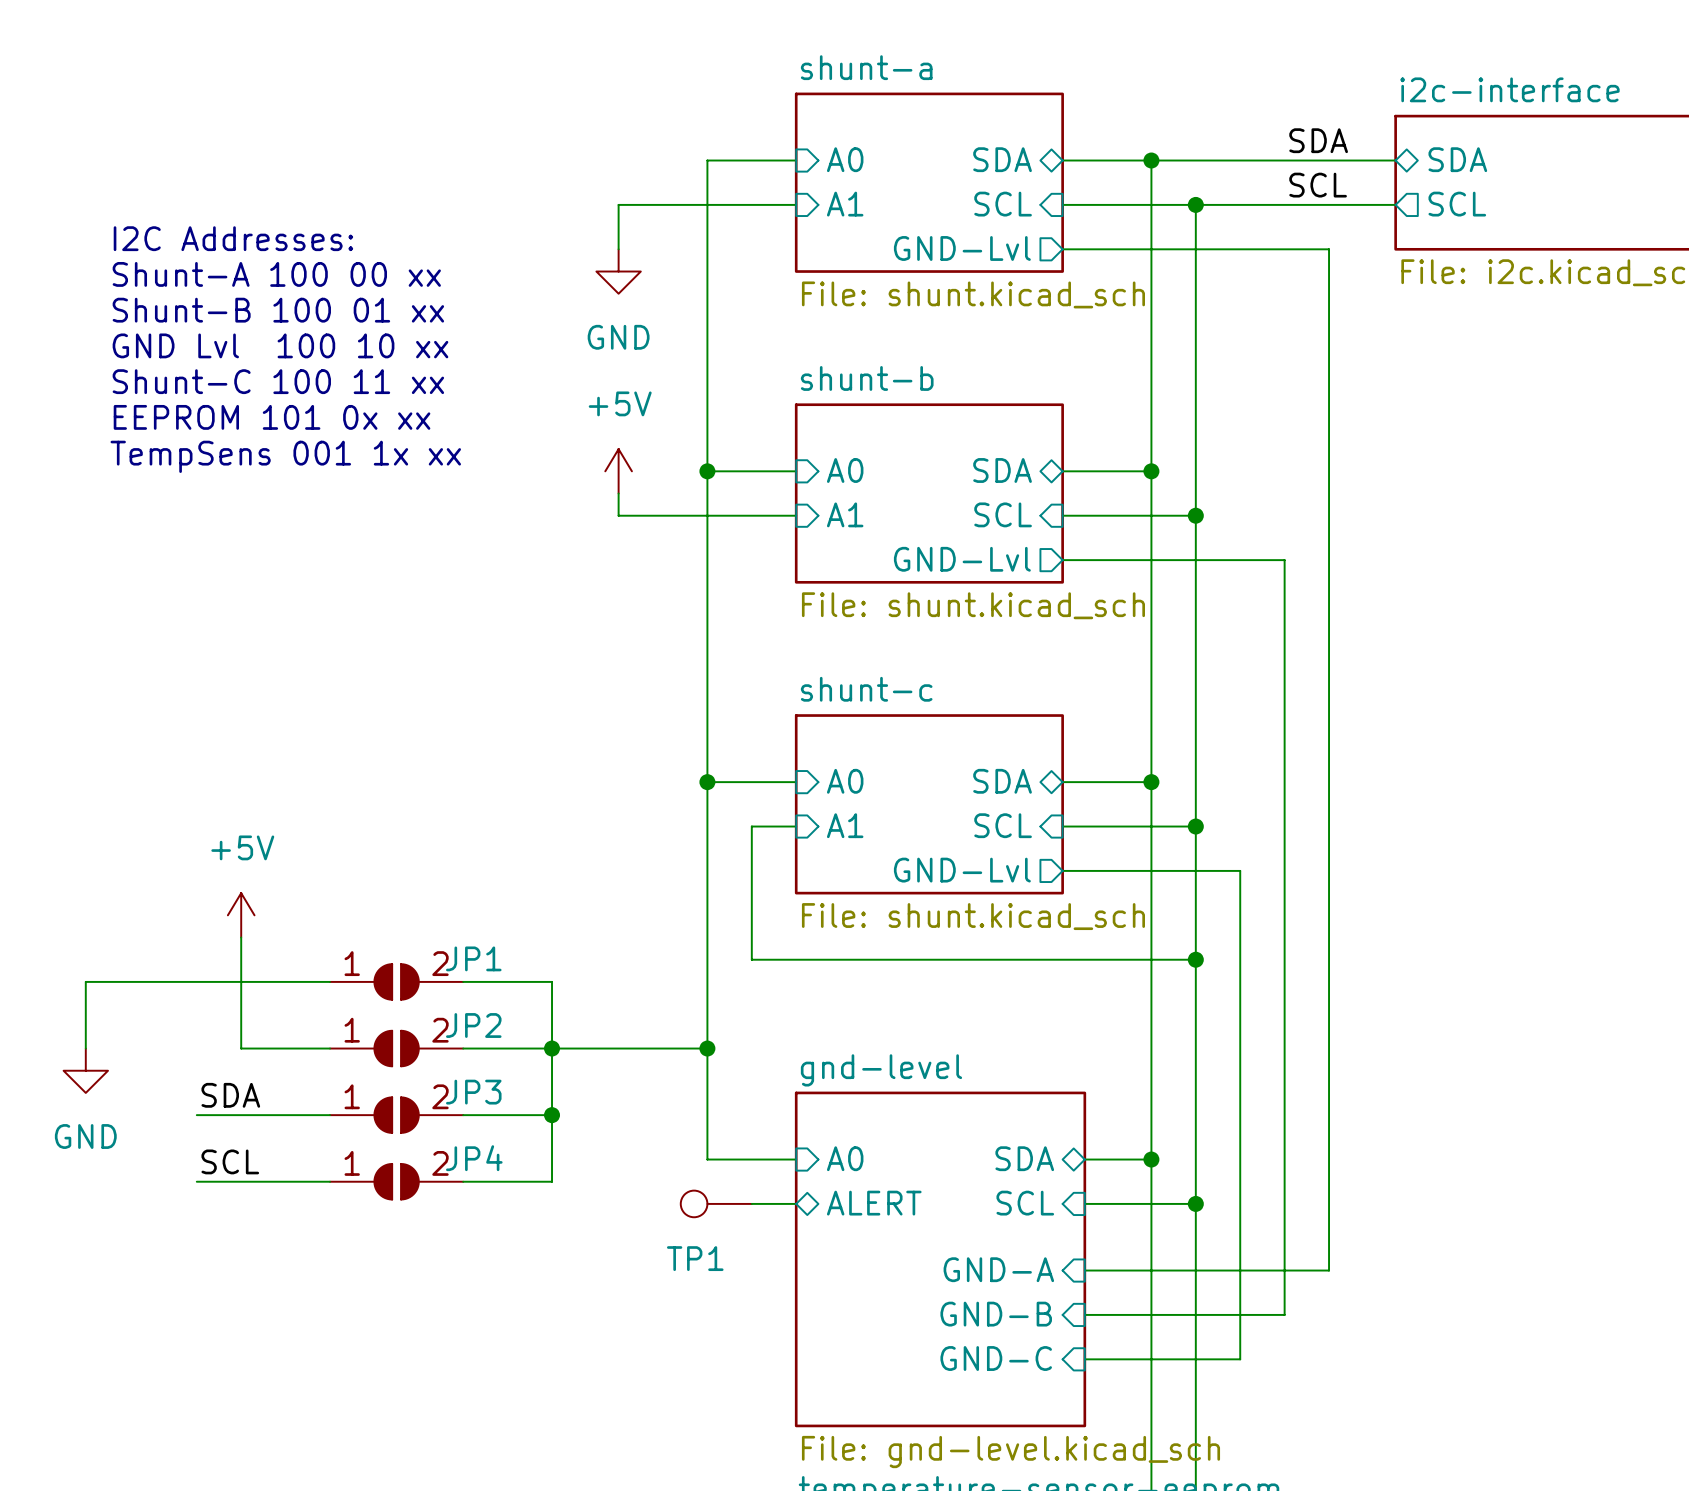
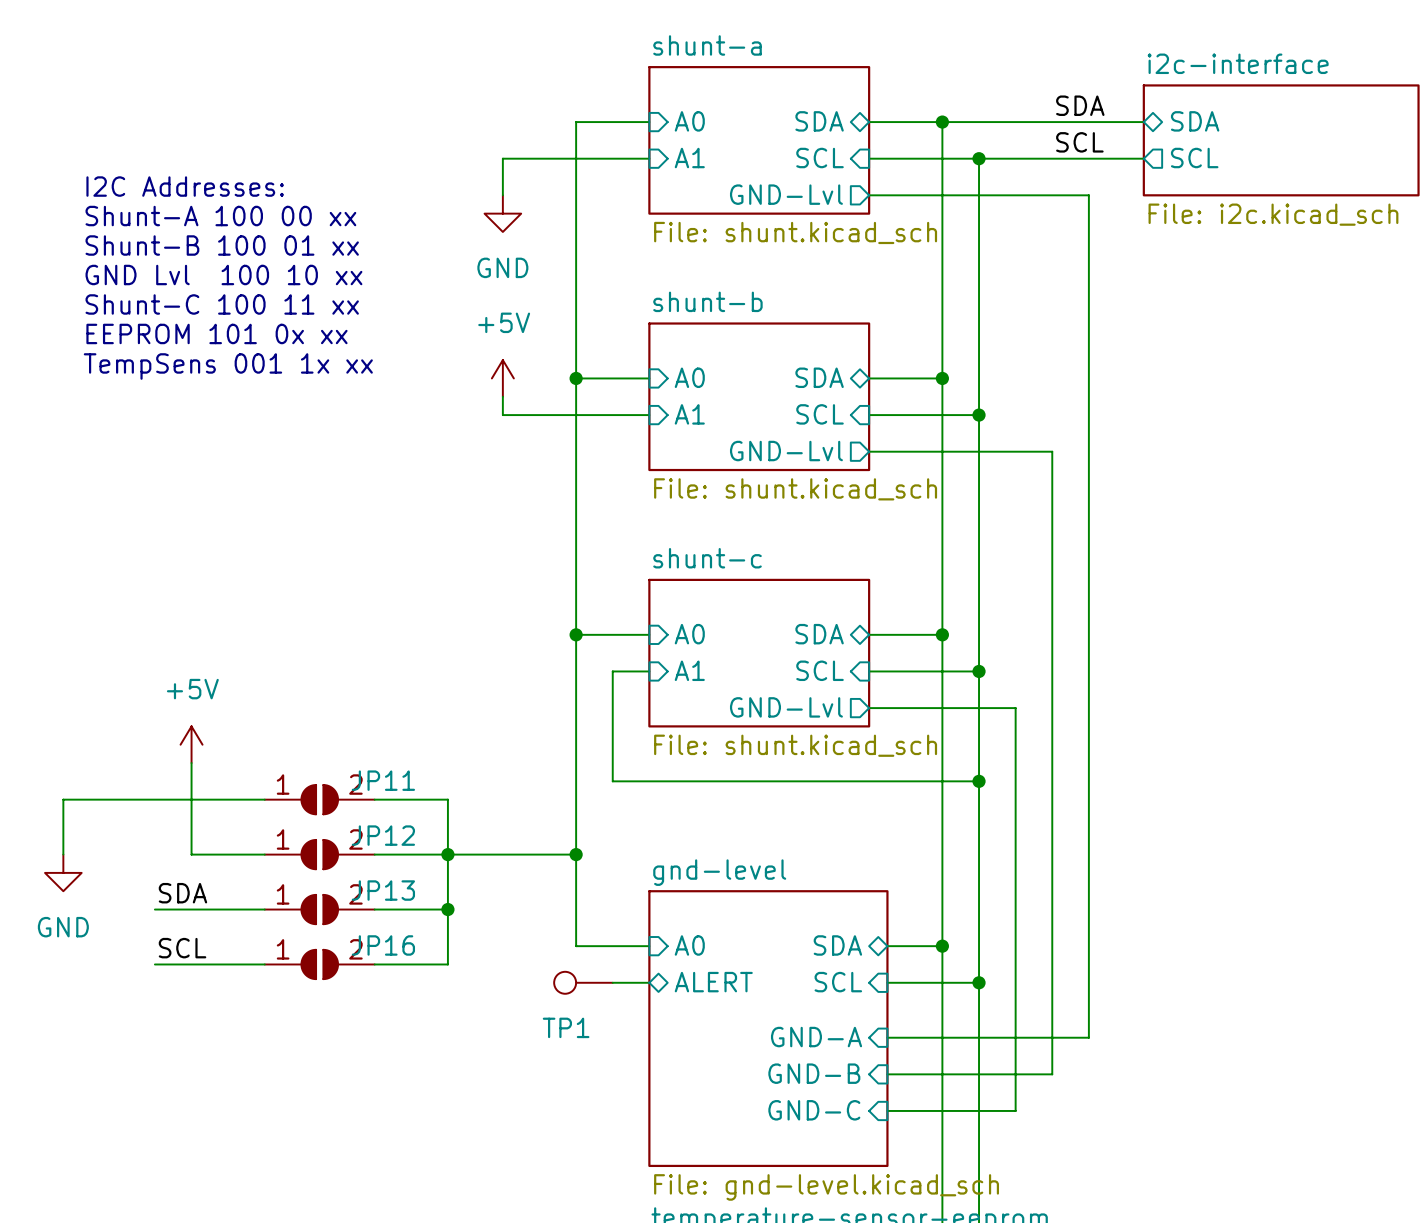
JP1 name: JP1 (473, 958) -> JP11 (383, 780)
JP2 name: JP2 (473, 1025) -> JP12 (383, 835)
JP3 name: JP3 (473, 1092) -> JP13 (383, 890)
JP4 name: JP4 (474, 1158) -> JP16 (383, 945)

